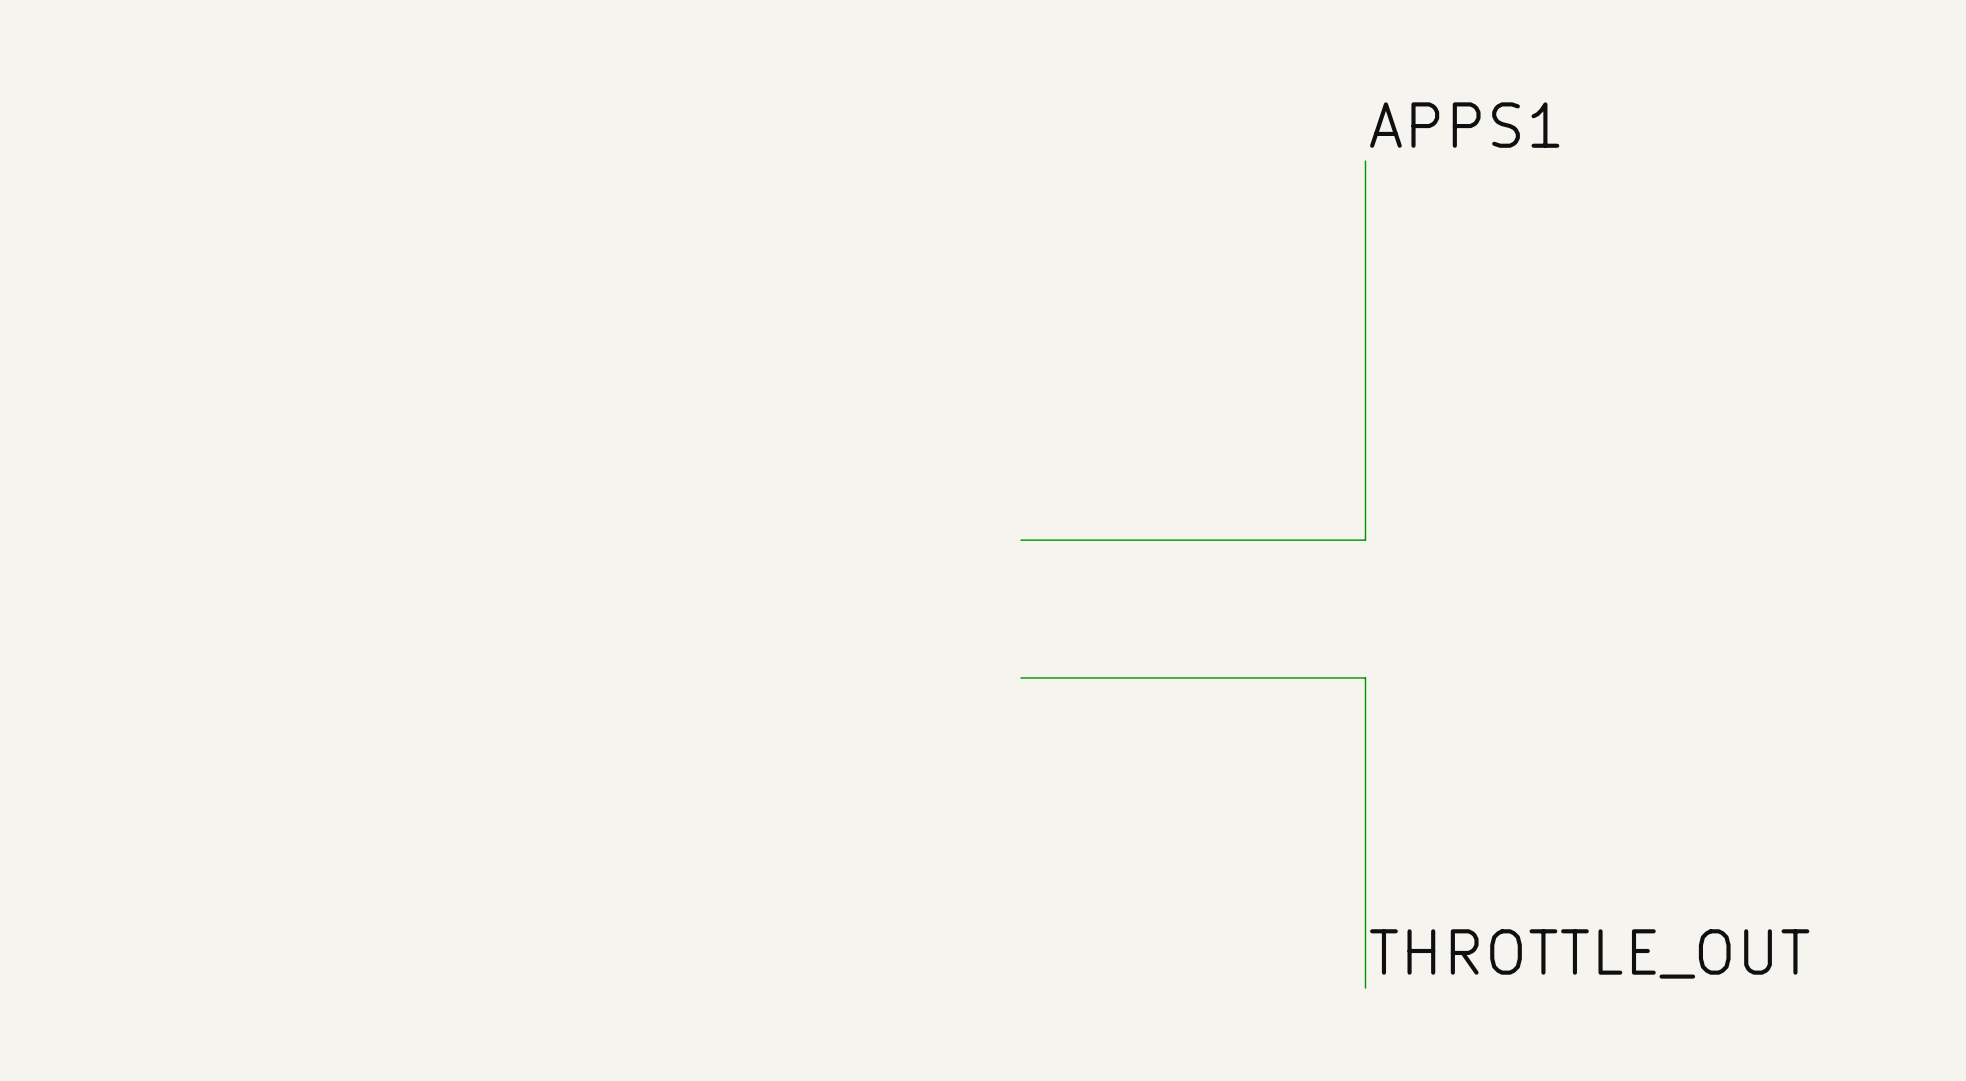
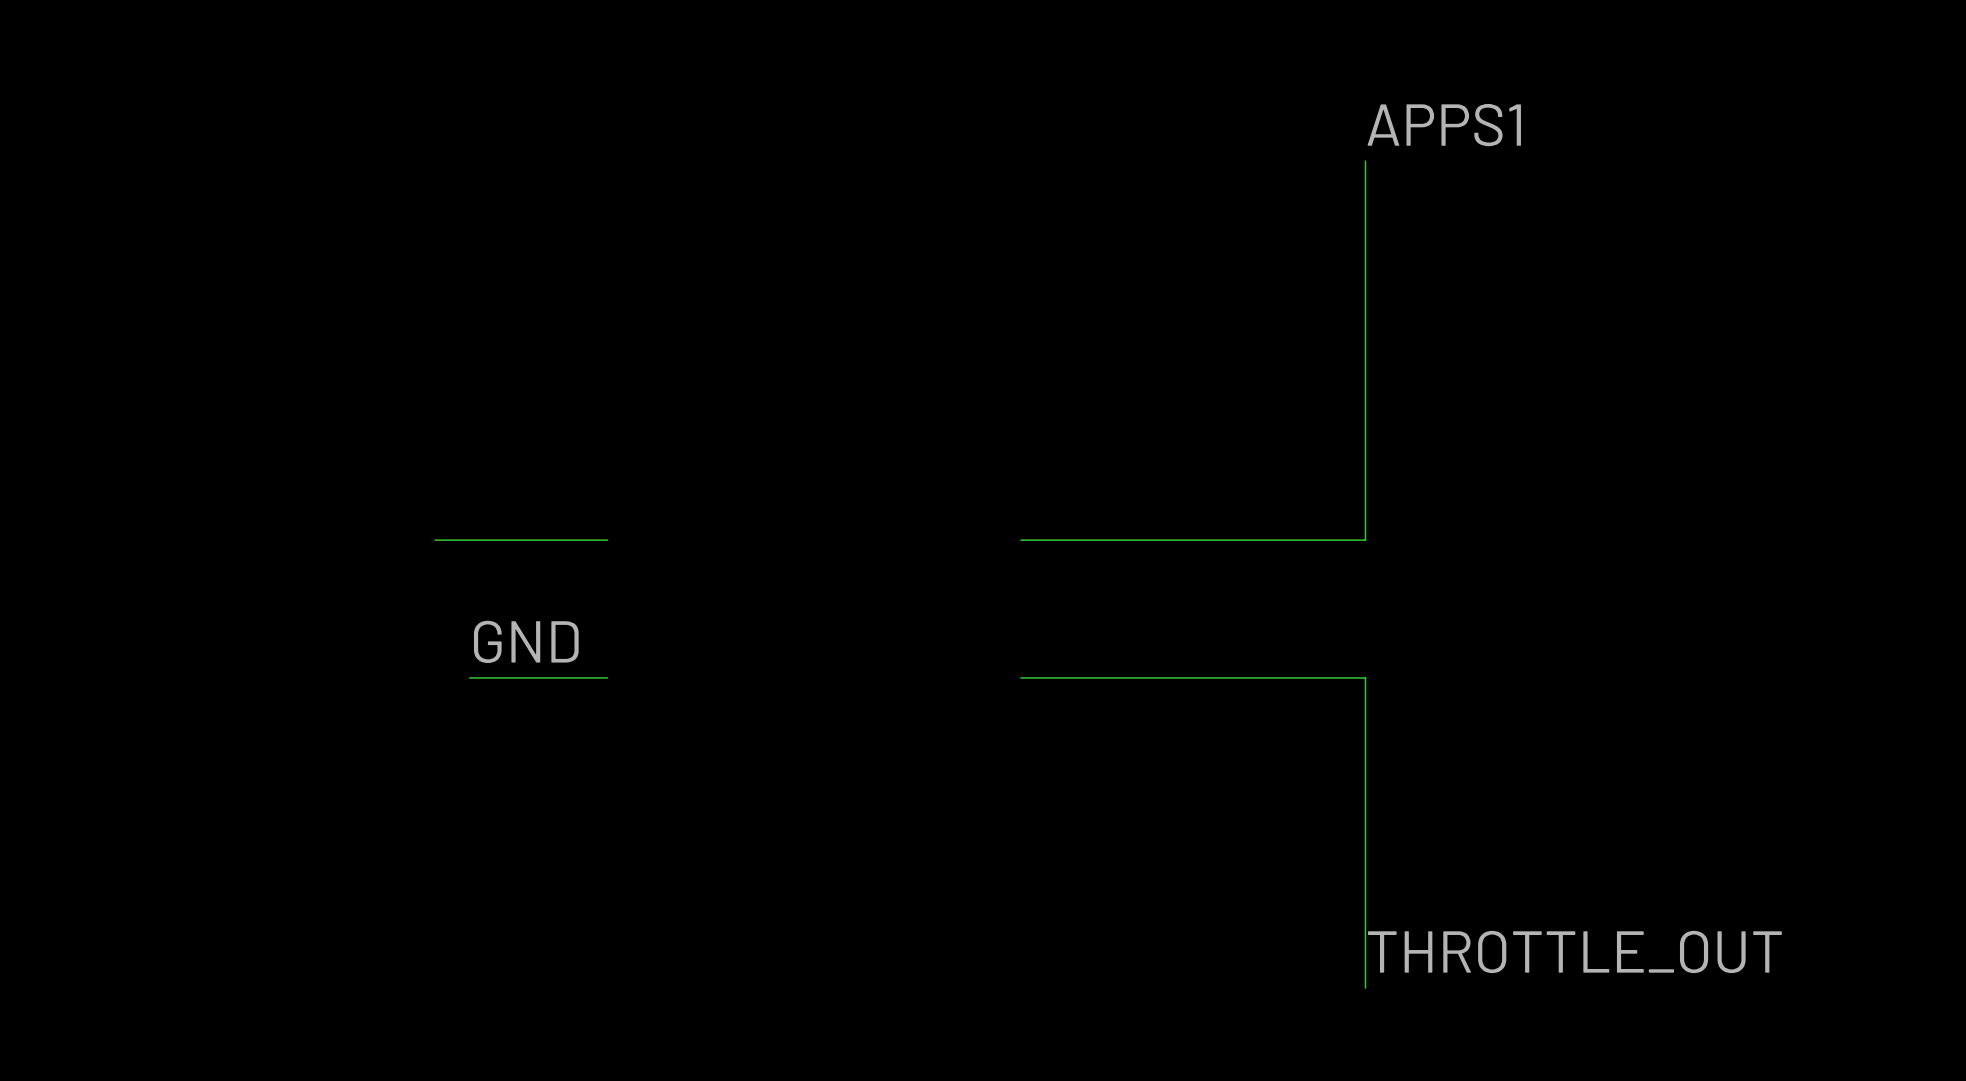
wire: none -> (435, 540) (607, 540)
label: none -> GND (526, 641)
wire: none -> (469, 677) (607, 677)

